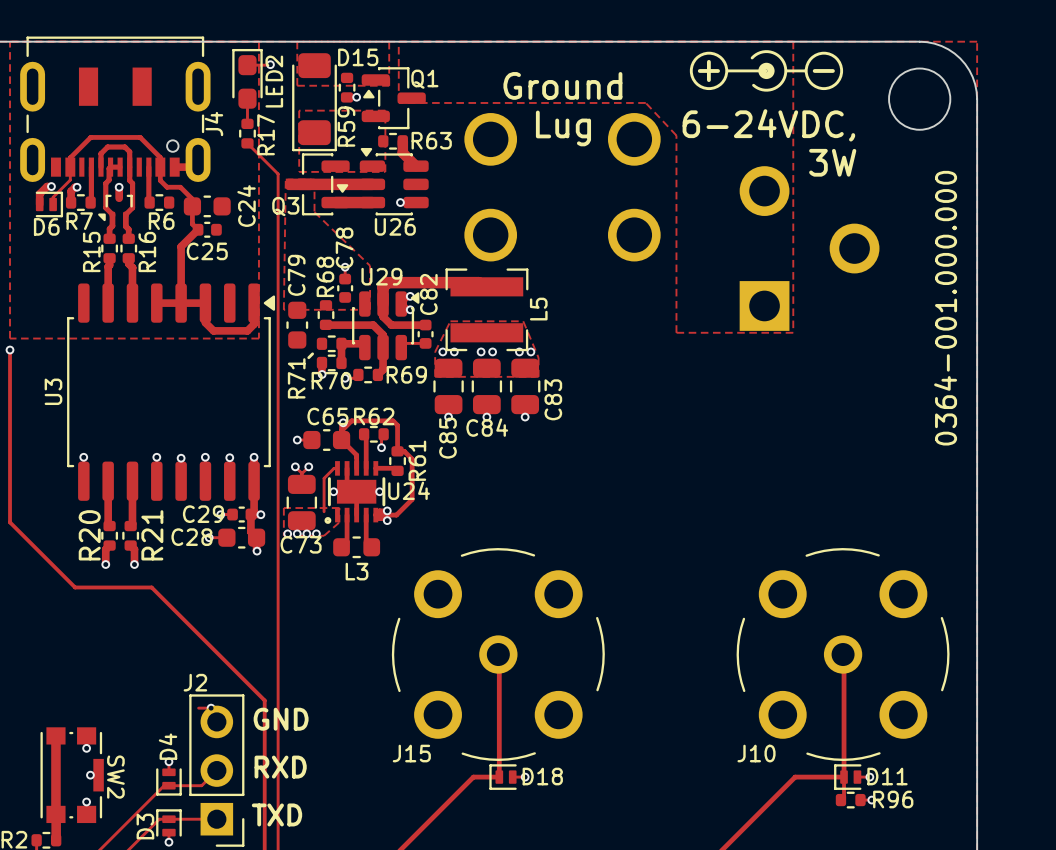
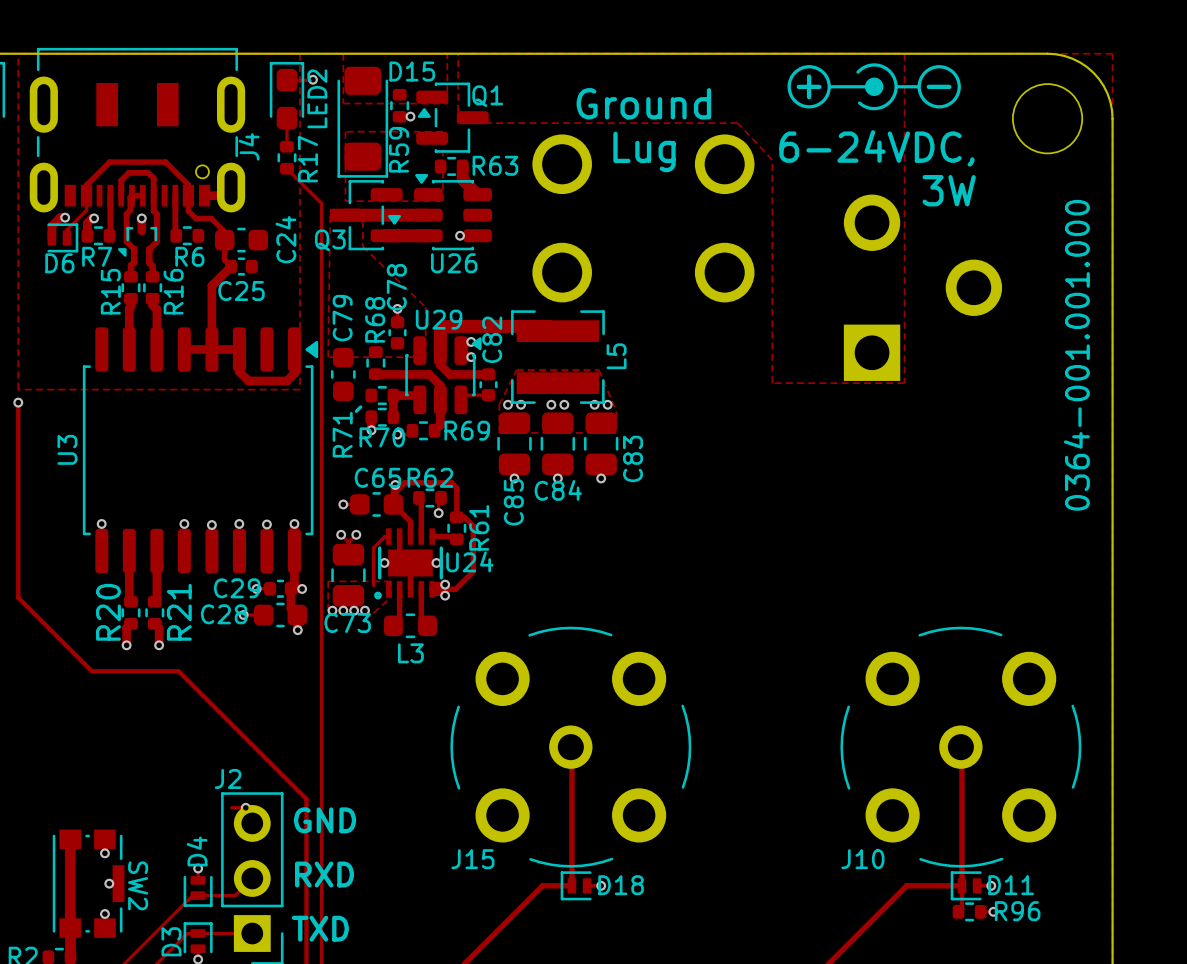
text: 0364-001.000.000 (945, 308) -> 0364-001.001.000 (1076, 355)

